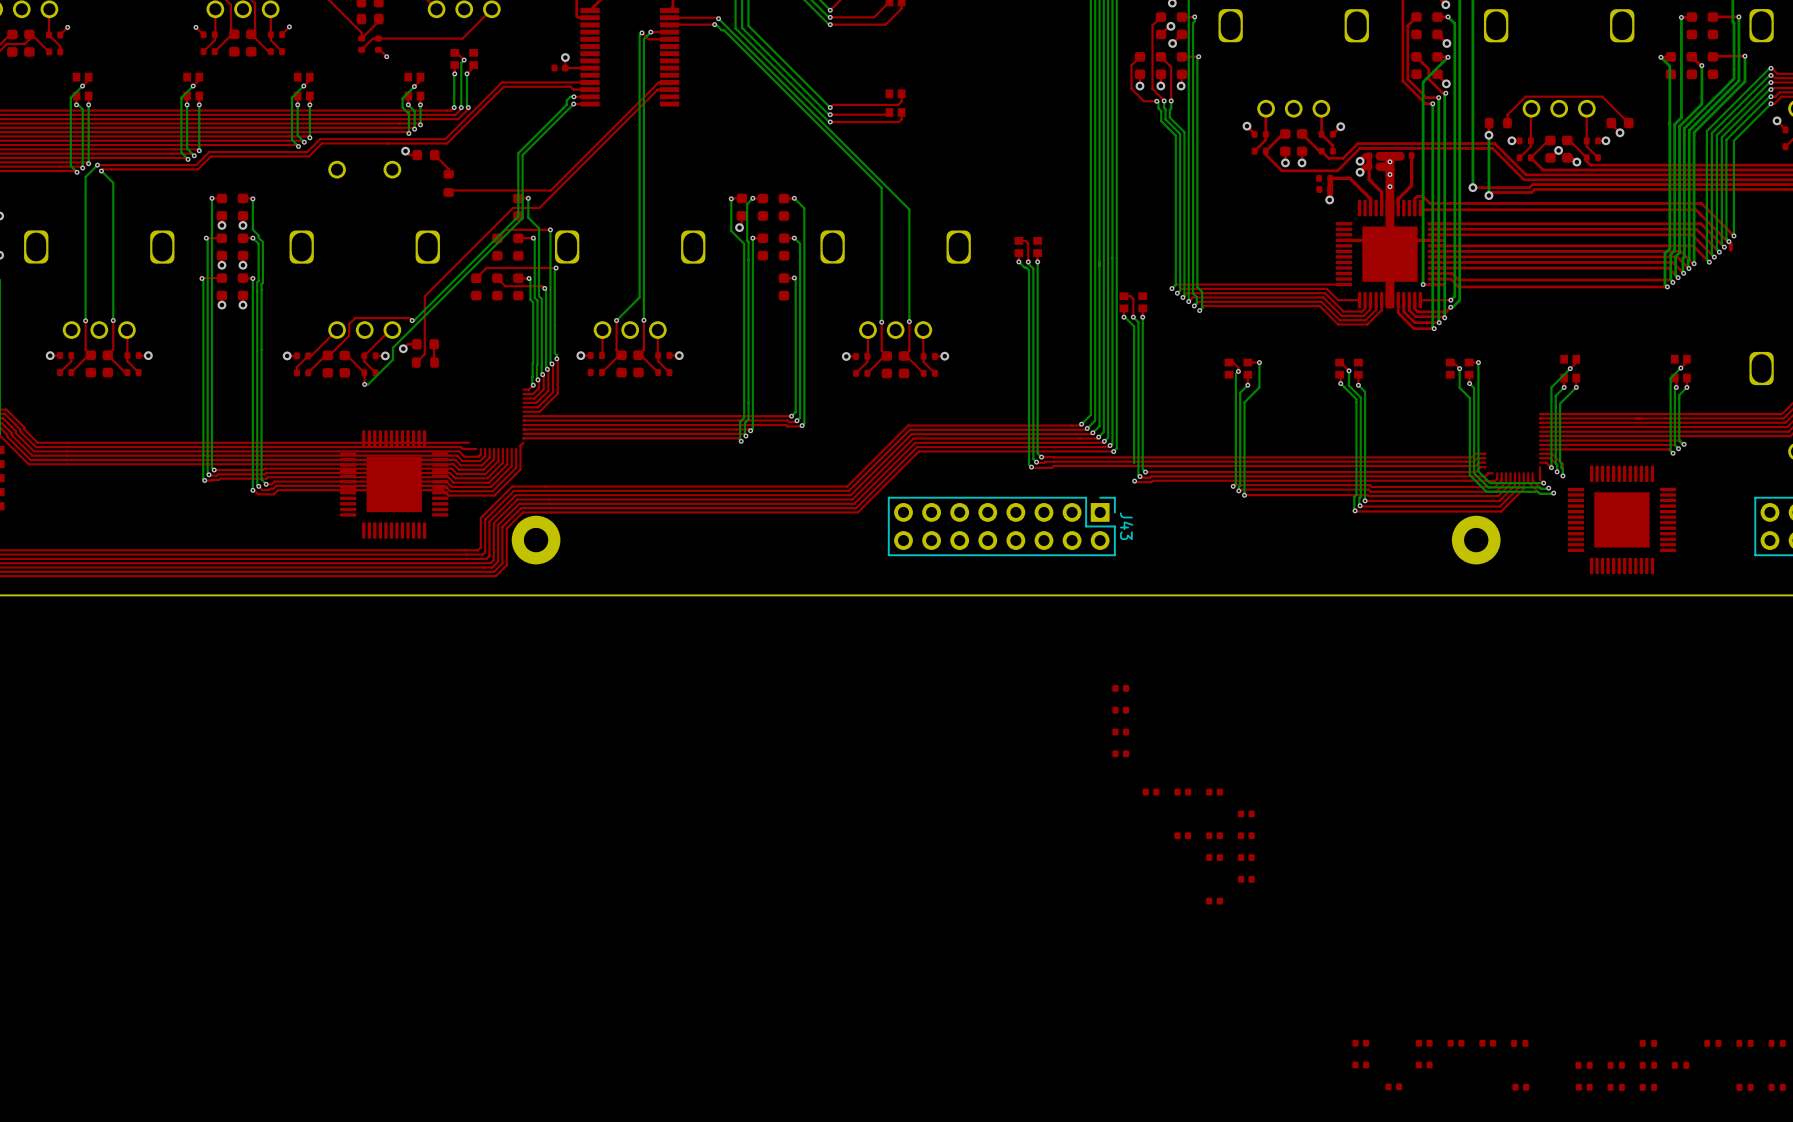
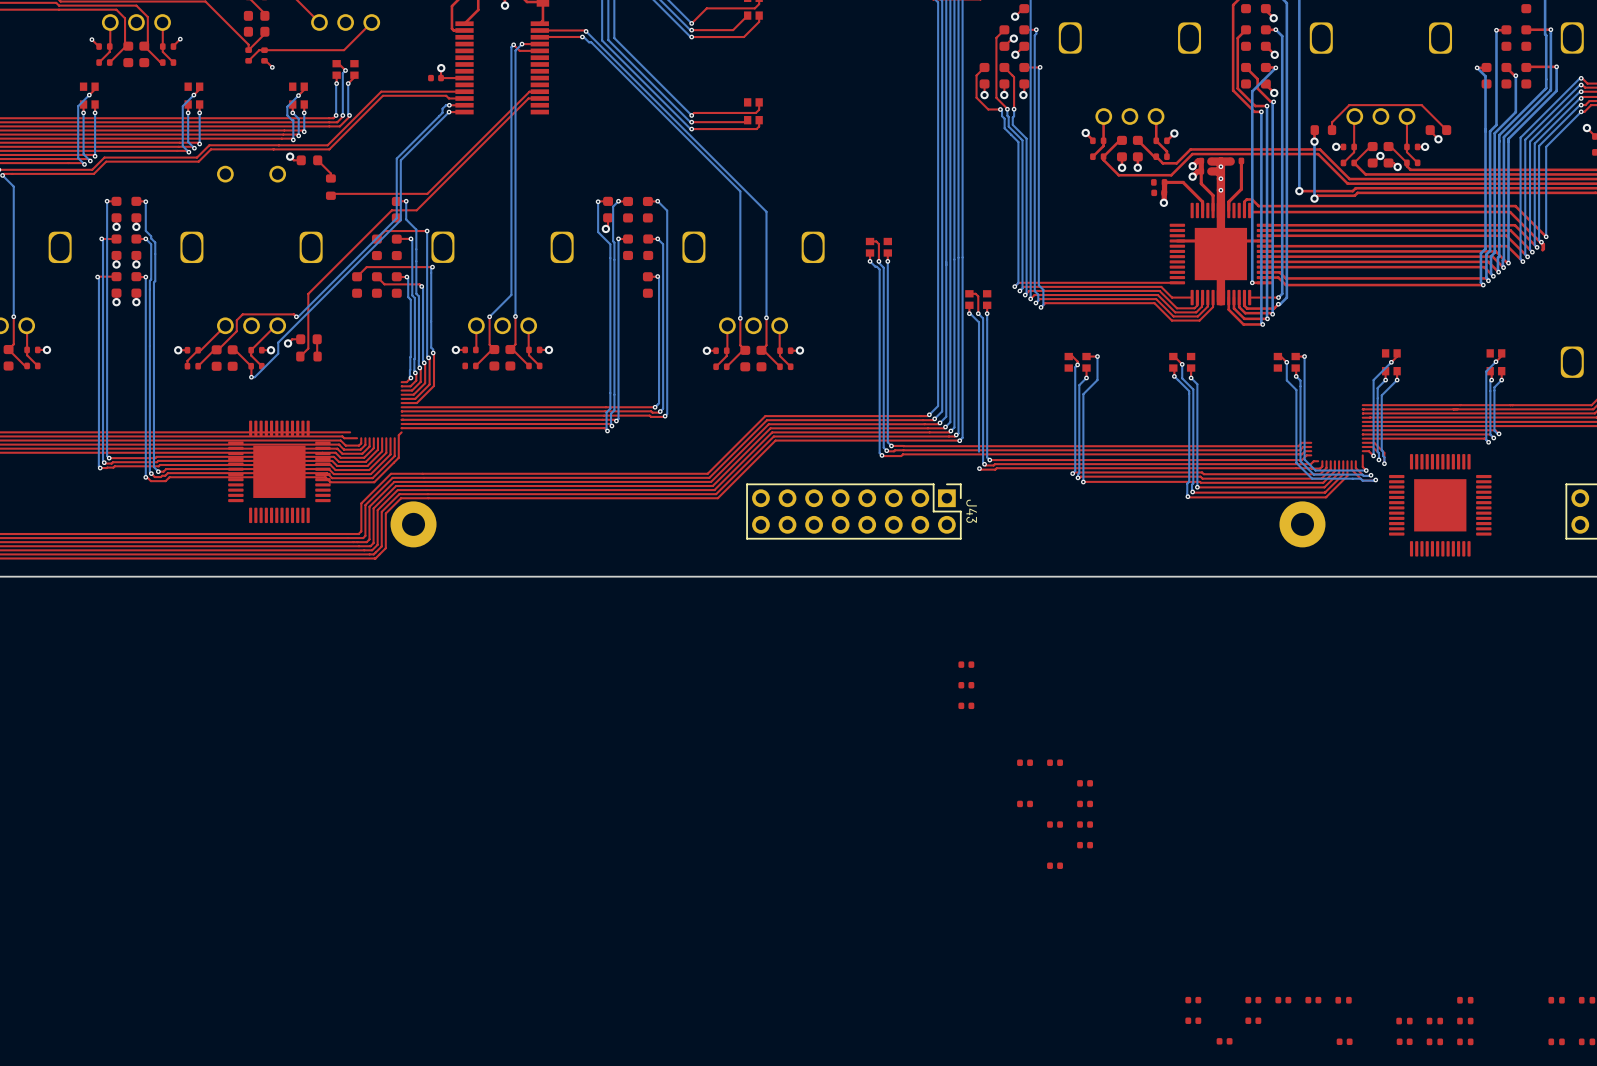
part: (1120, 753) -> none
part: (1151, 792) -> none
part: (1214, 835) -> none
part: (1712, 1043) -> none
part: (1680, 1065) -> none

